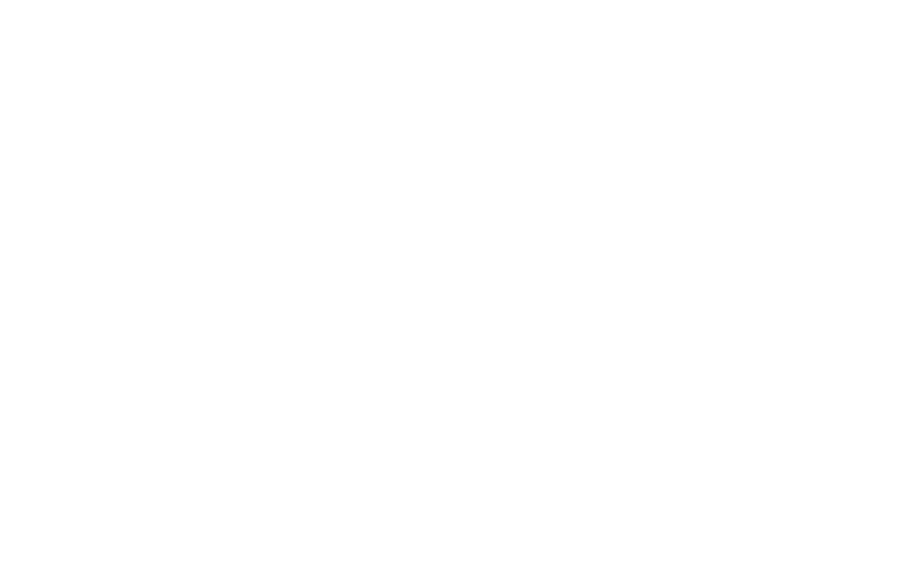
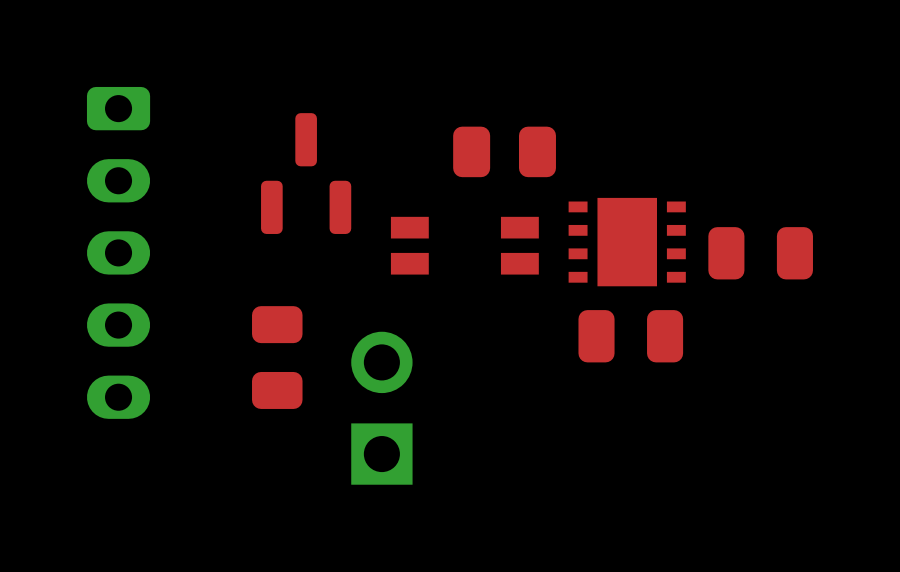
part: none -> (504, 151)
part: none -> (306, 173)
part: none -> (627, 242)
part: none -> (464, 245)
part: none -> (118, 252)
part: none -> (760, 253)
part: none -> (630, 336)
part: none -> (277, 357)
part: none -> (381, 408)

